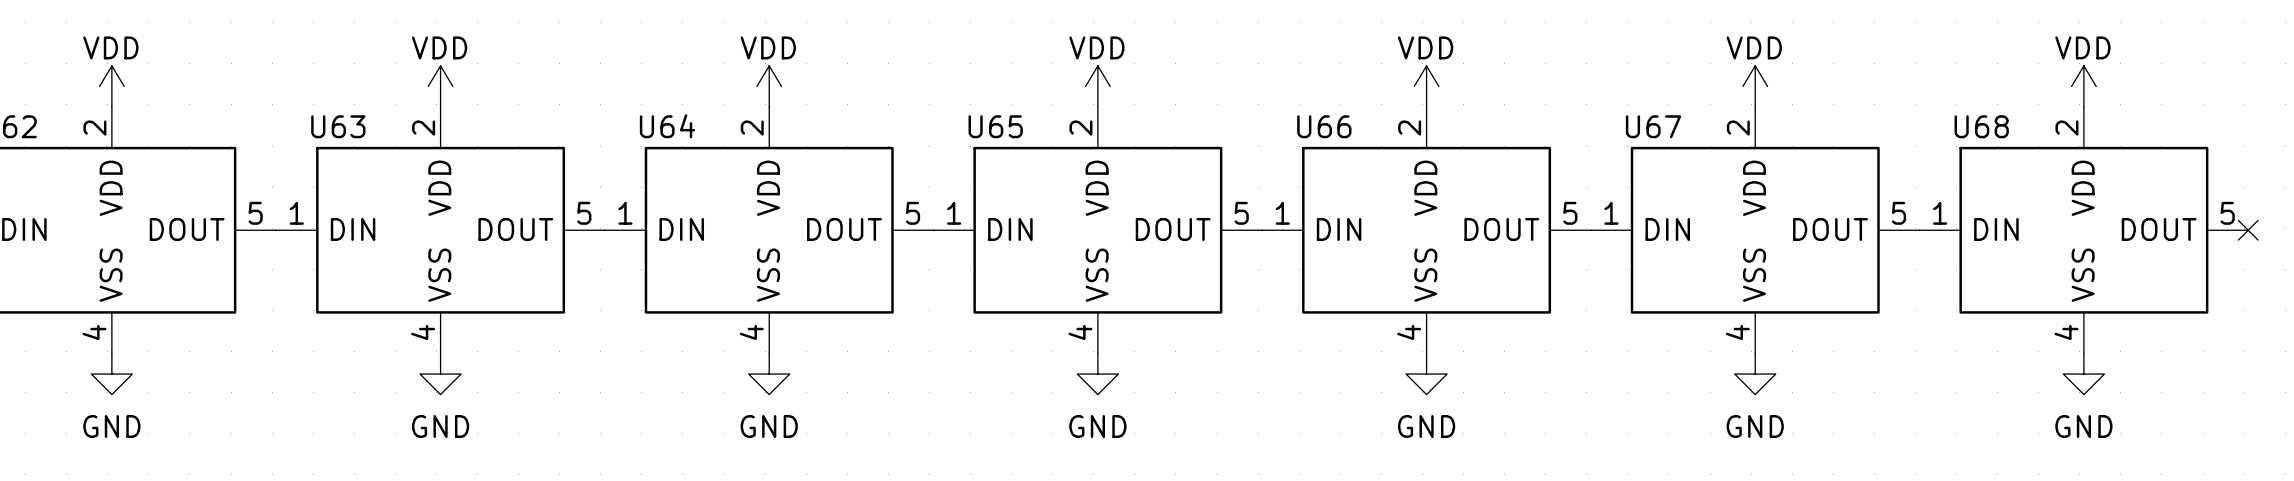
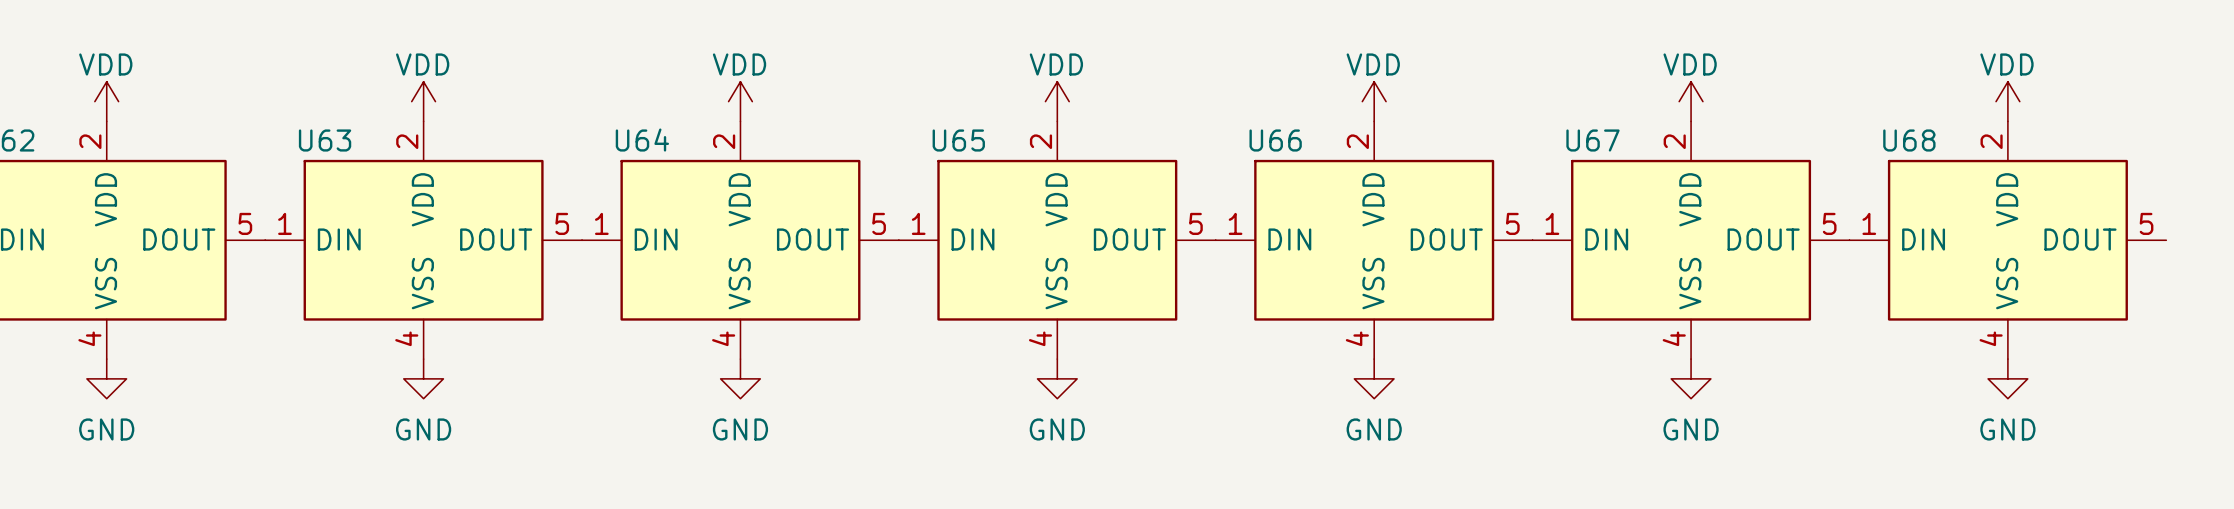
no-connect mark: (2248, 230) -> none

